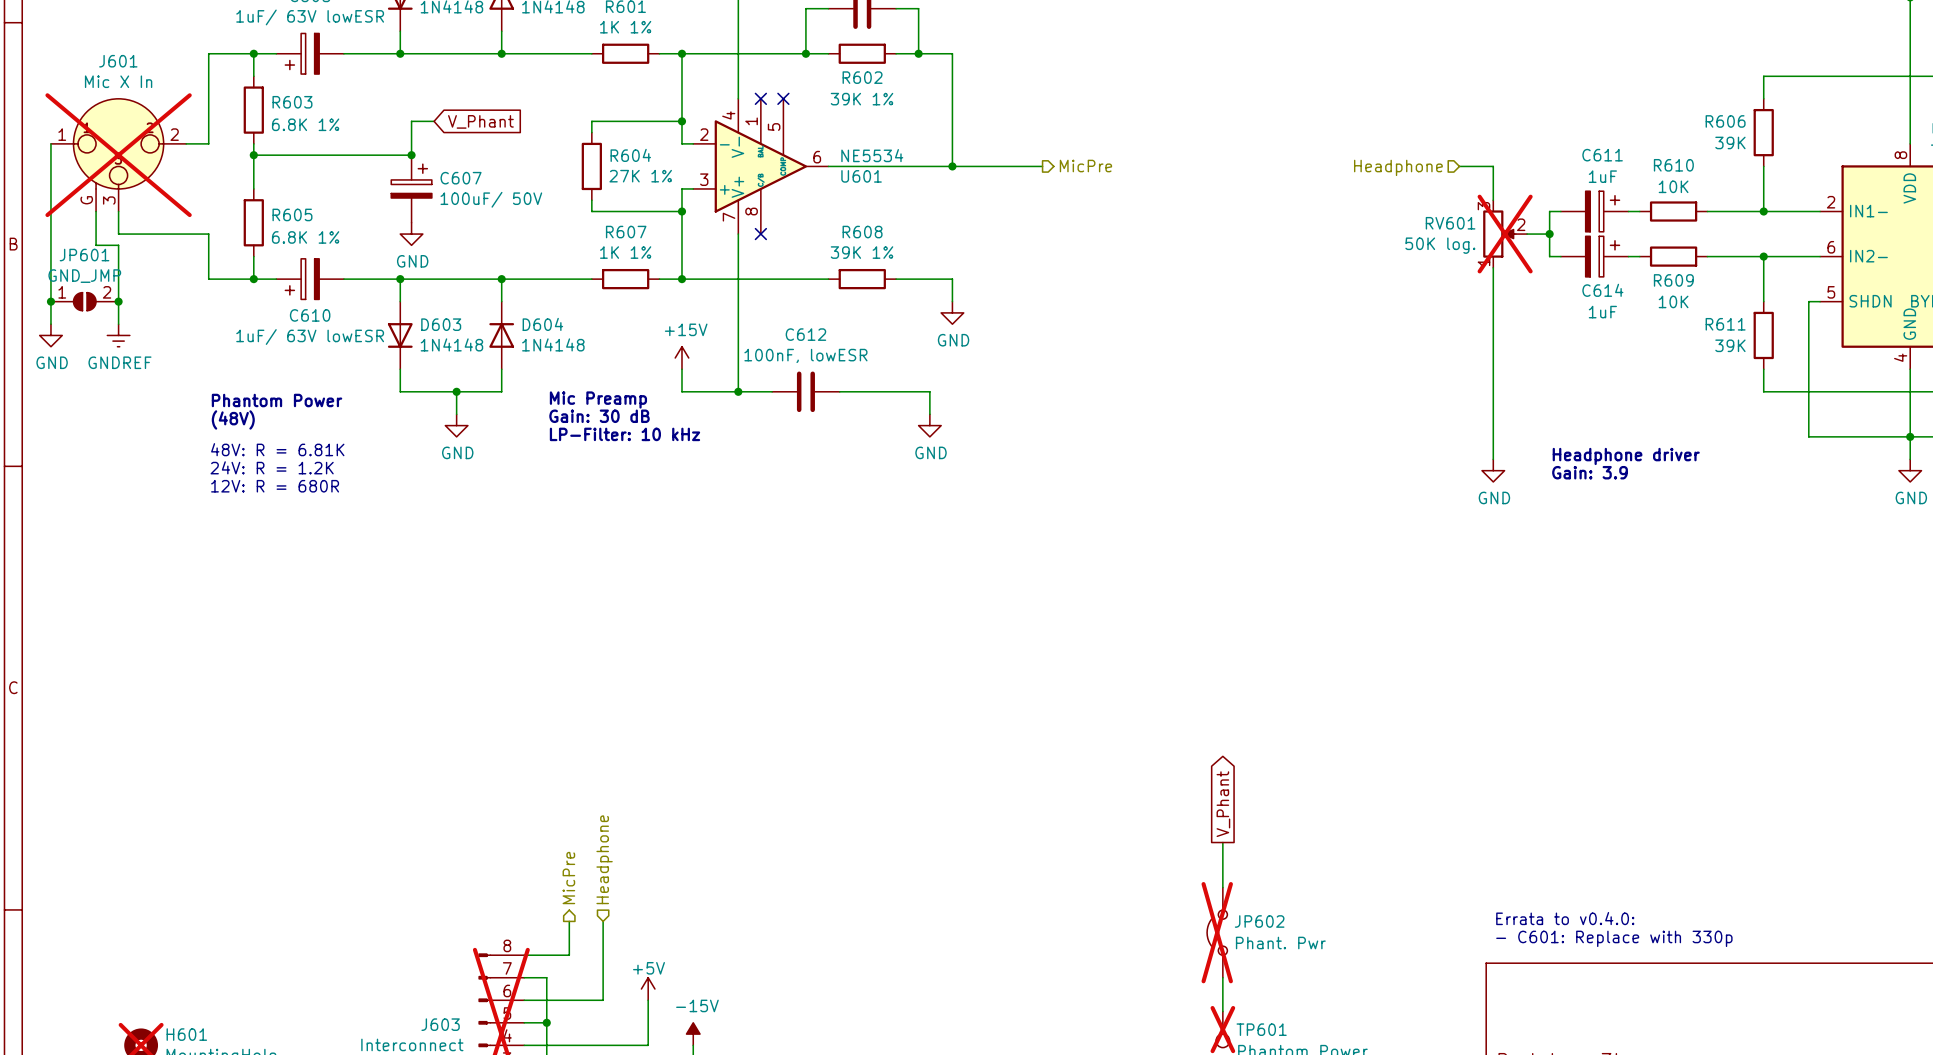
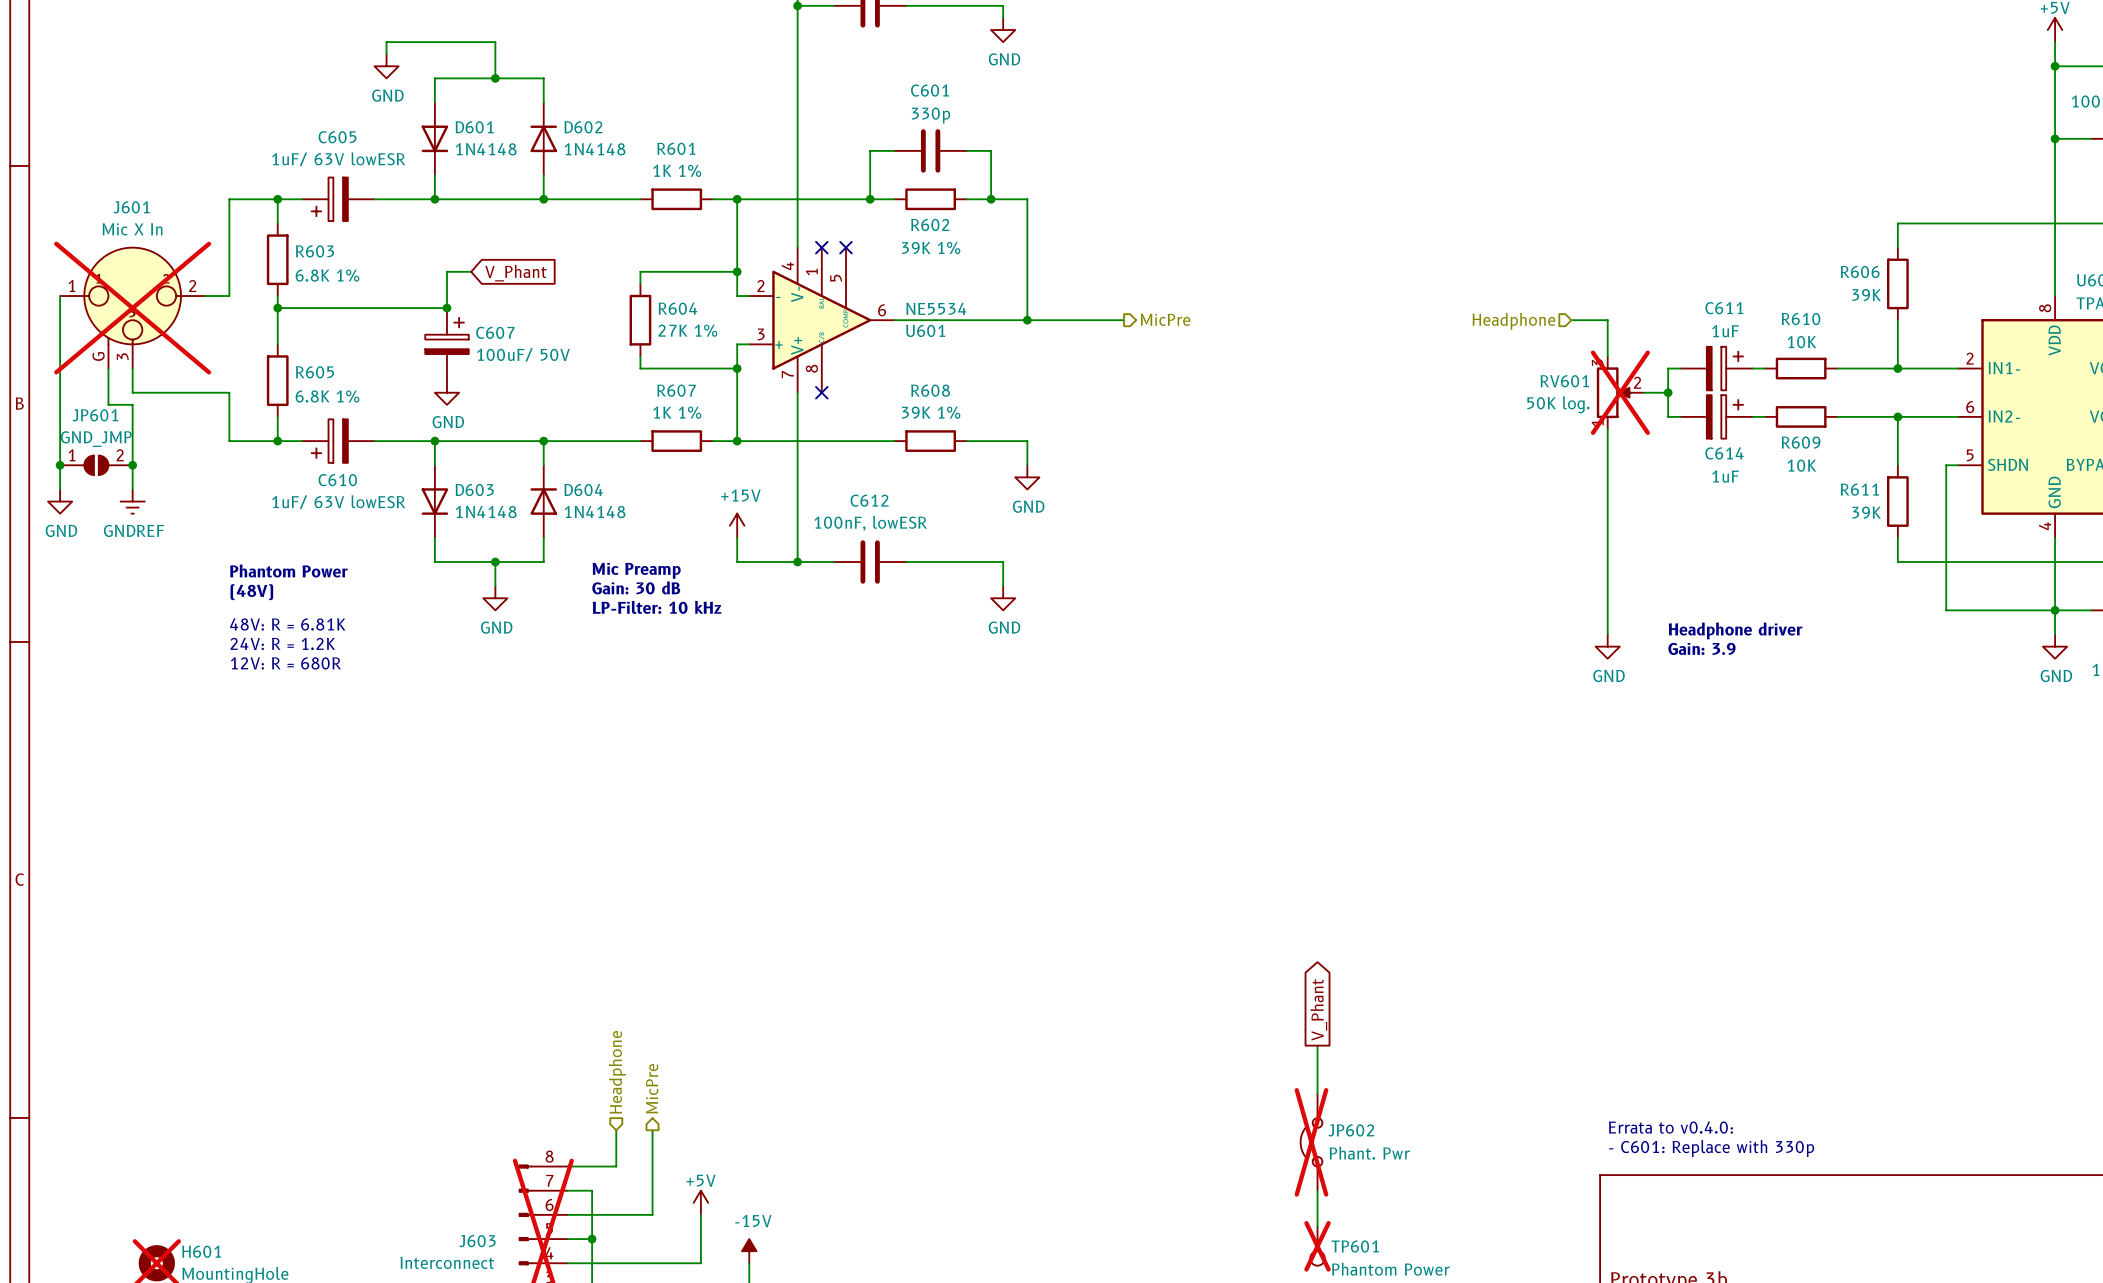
hierarchical label shape: input (604, 859) -> output (652, 1088)
hierarchical label: Headphone (604, 859) -> MicPre (652, 1088)
hierarchical label shape: output (568, 878) -> input (617, 1072)
hierarchical label: MicPre (568, 878) -> Headphone (617, 1072)

